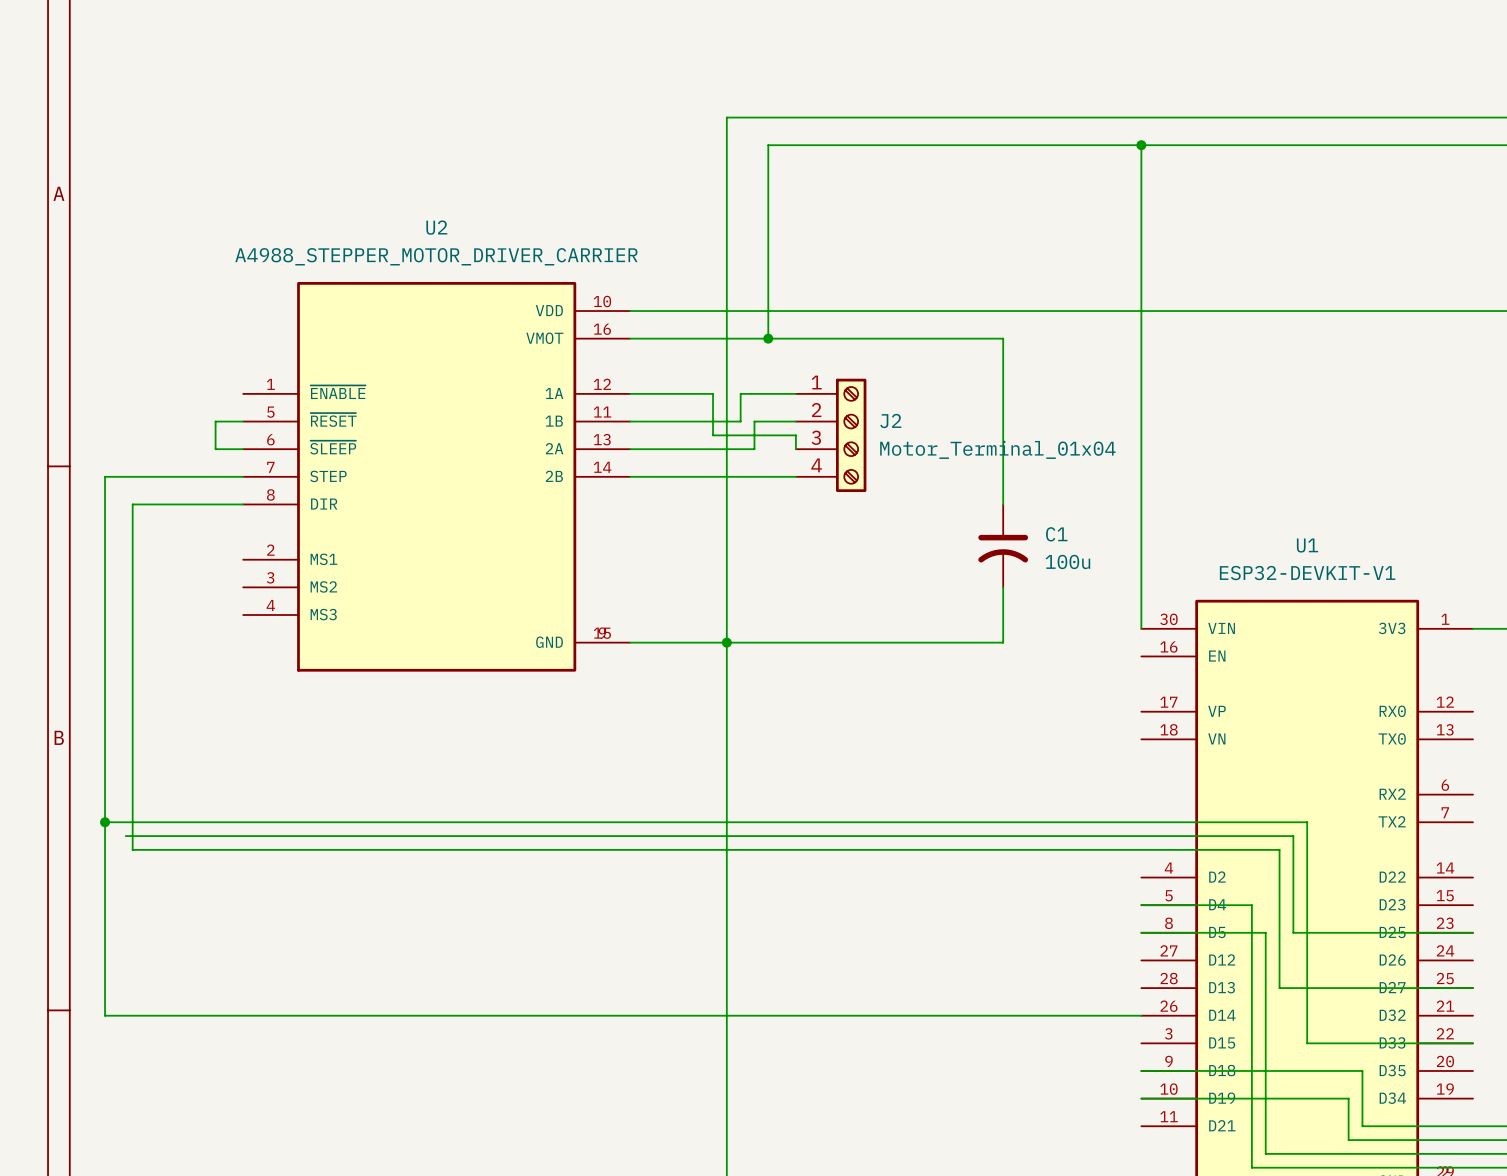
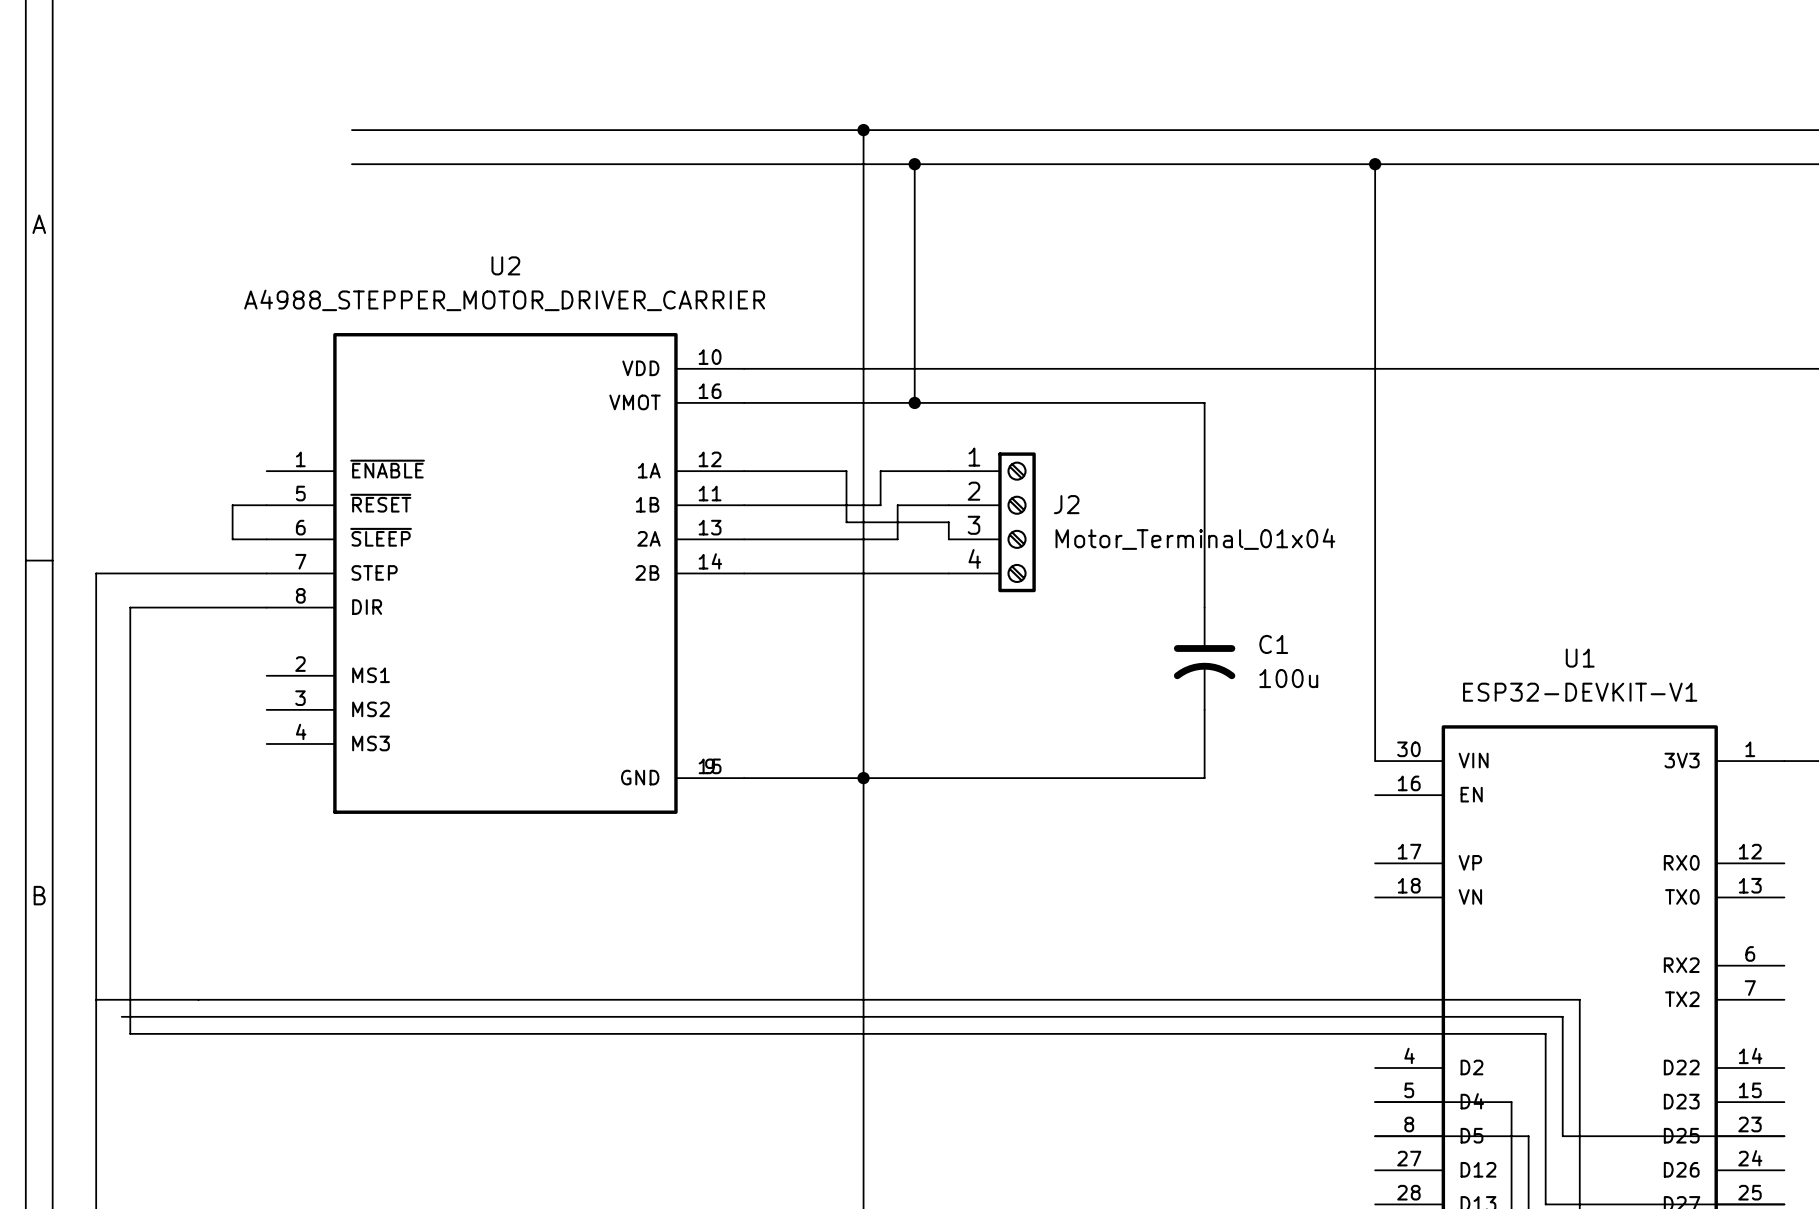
wire: none -> (351, 130) (863, 130)
junction: none -> (863, 130)
wire: none -> (351, 164) (914, 164)
junction: none -> (914, 164)
junction: (105, 822) -> none

